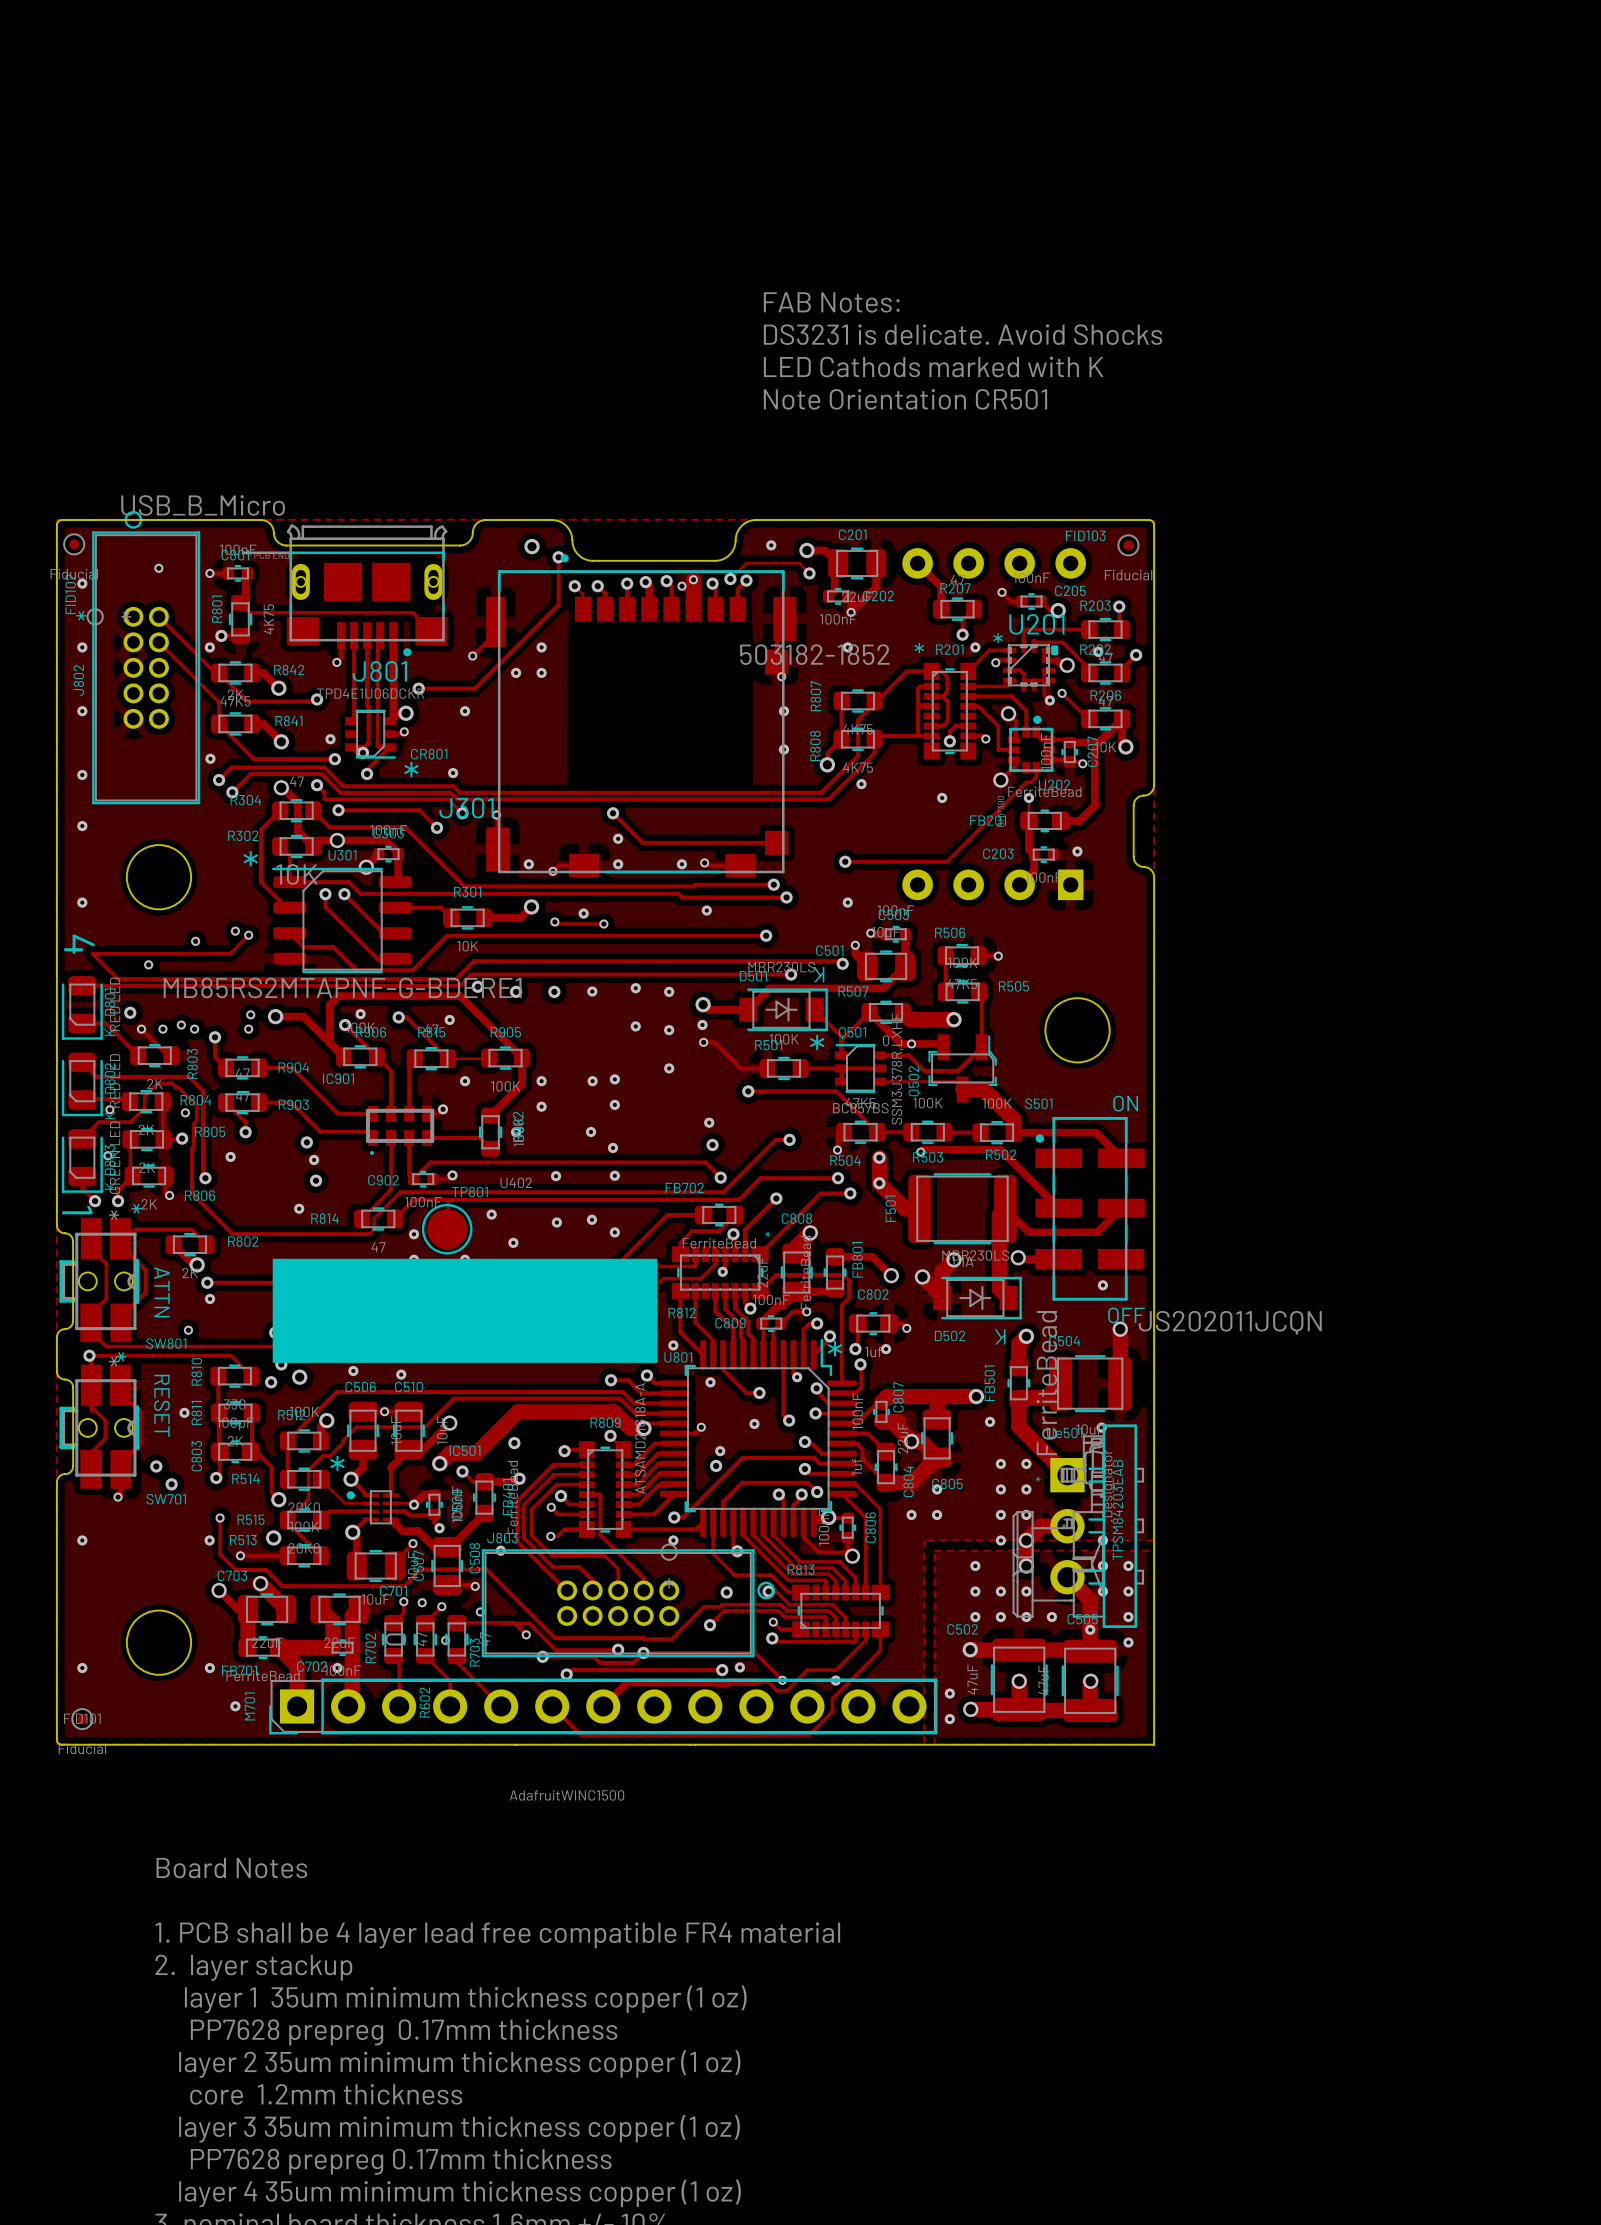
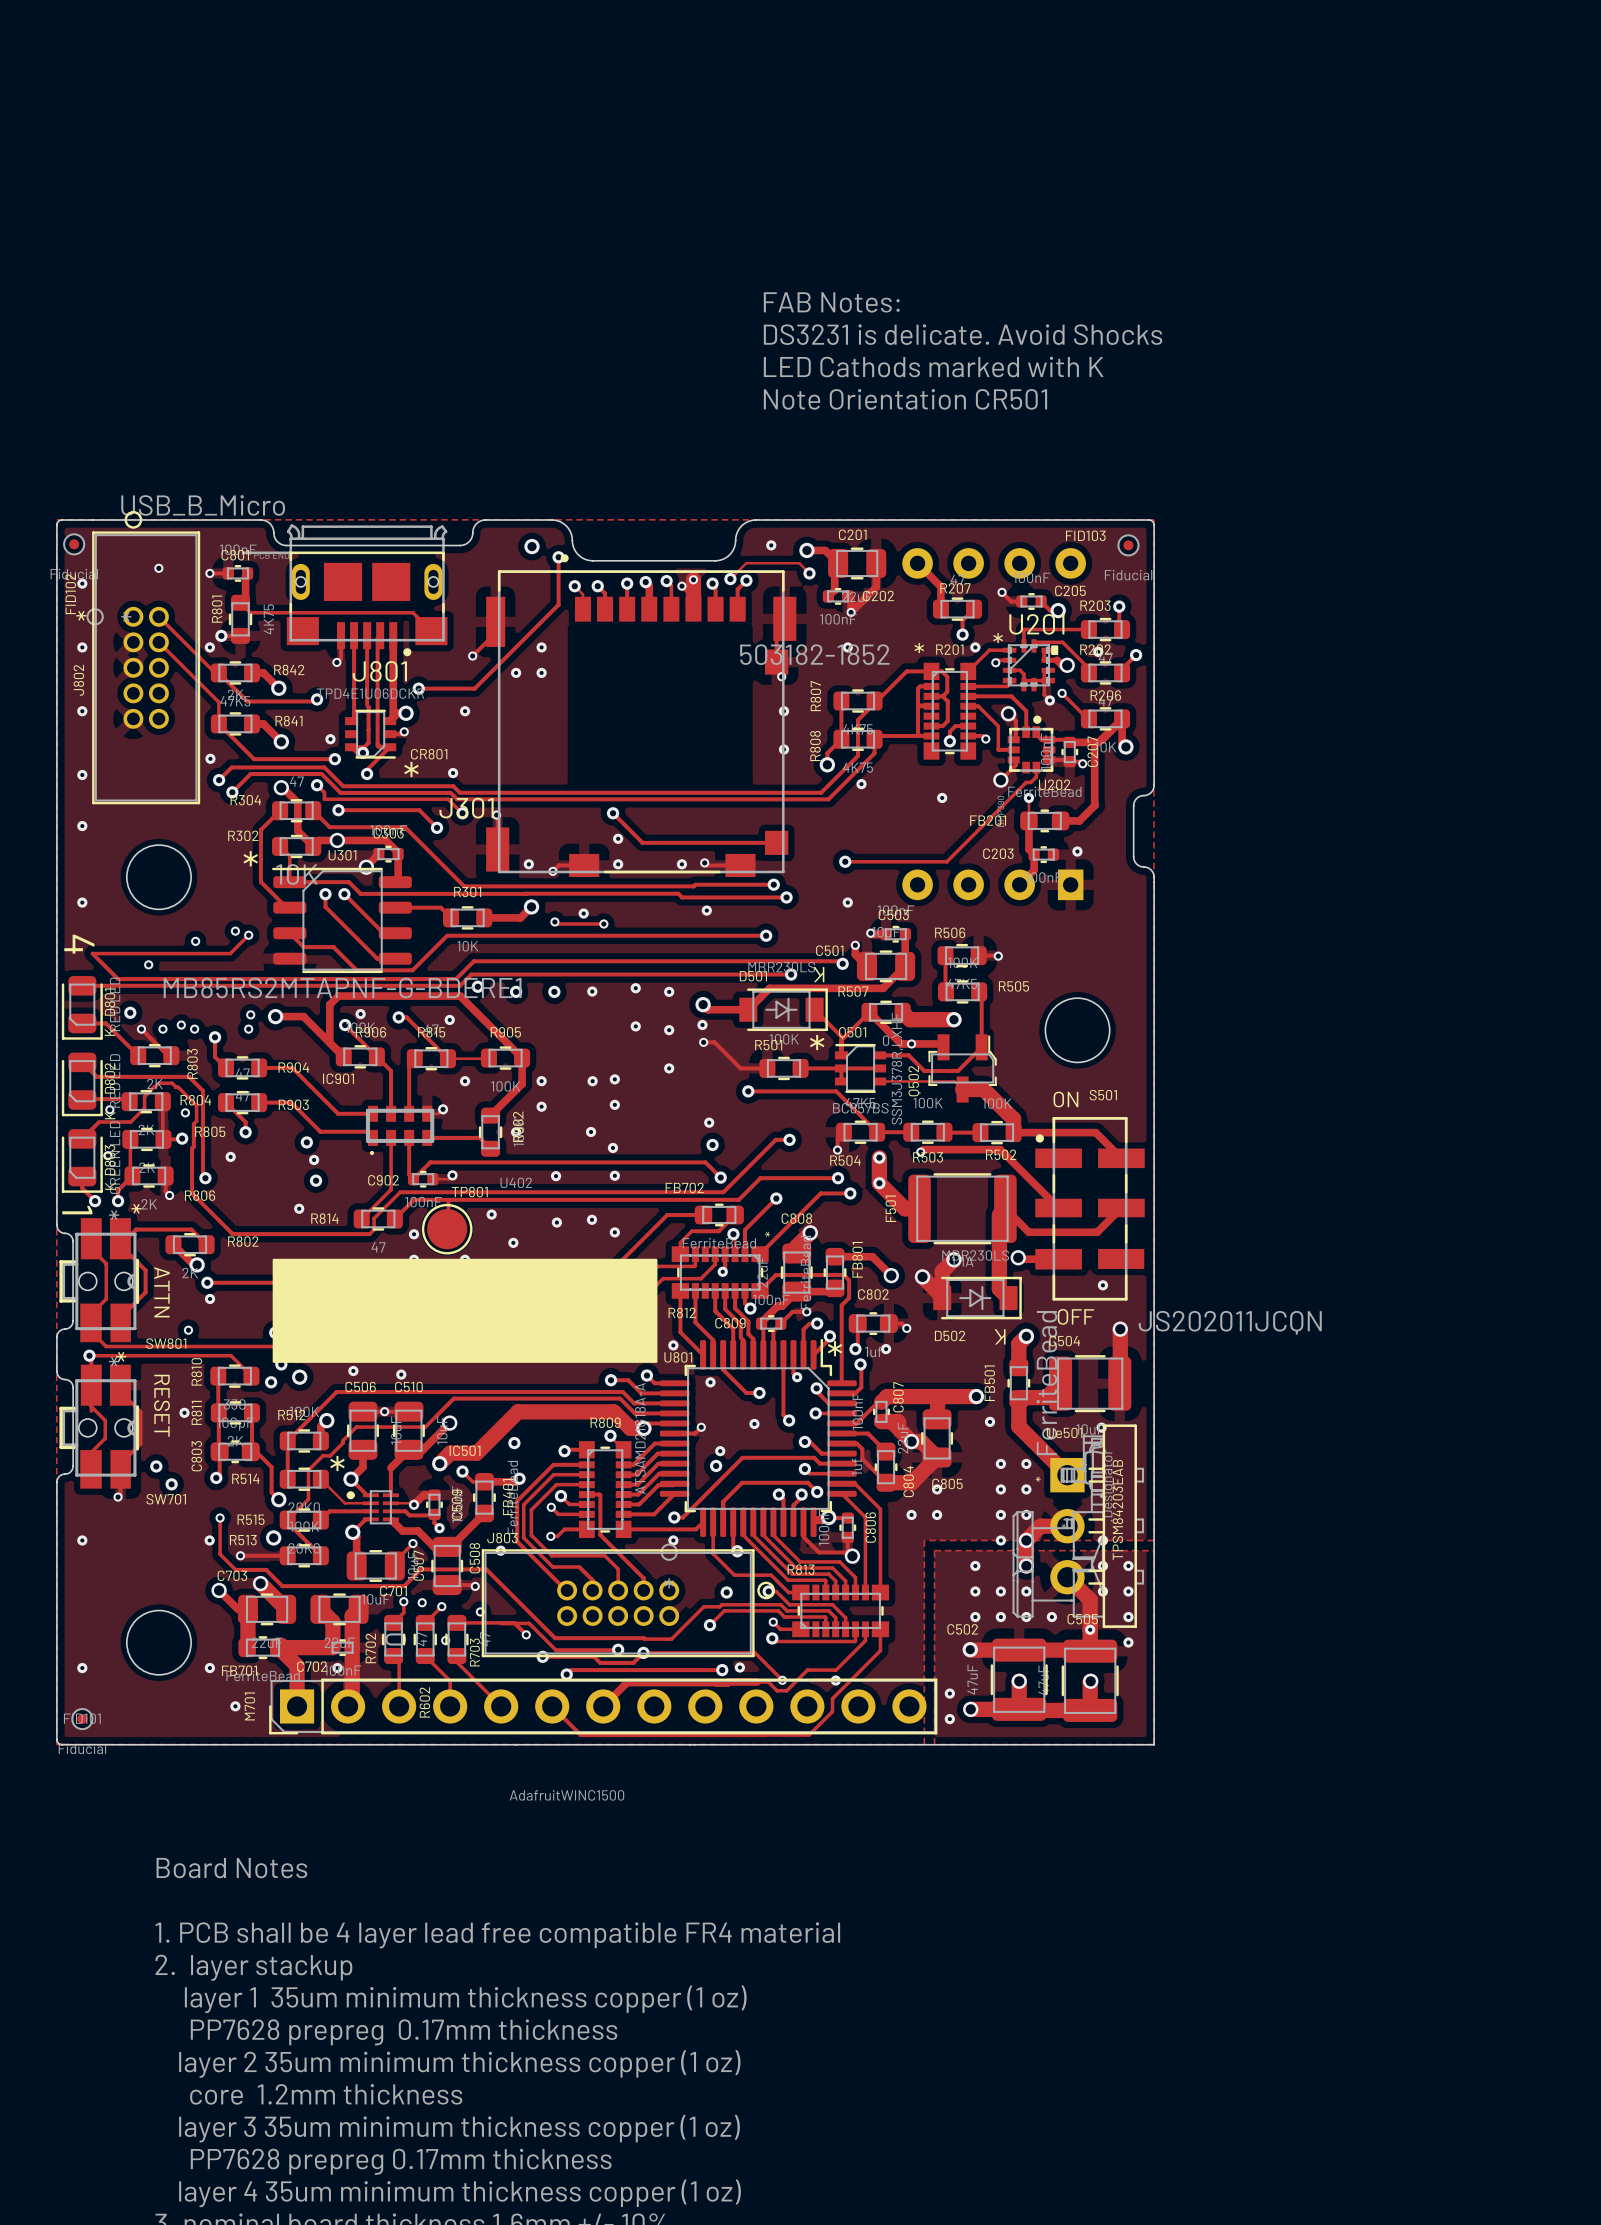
S501 name position: S501 (1038, 1103) -> S501 (1103, 1095)
text position: ON (1125, 1103) -> ON (1065, 1099)
text position: OFF (1126, 1315) -> OFF (1075, 1316)

